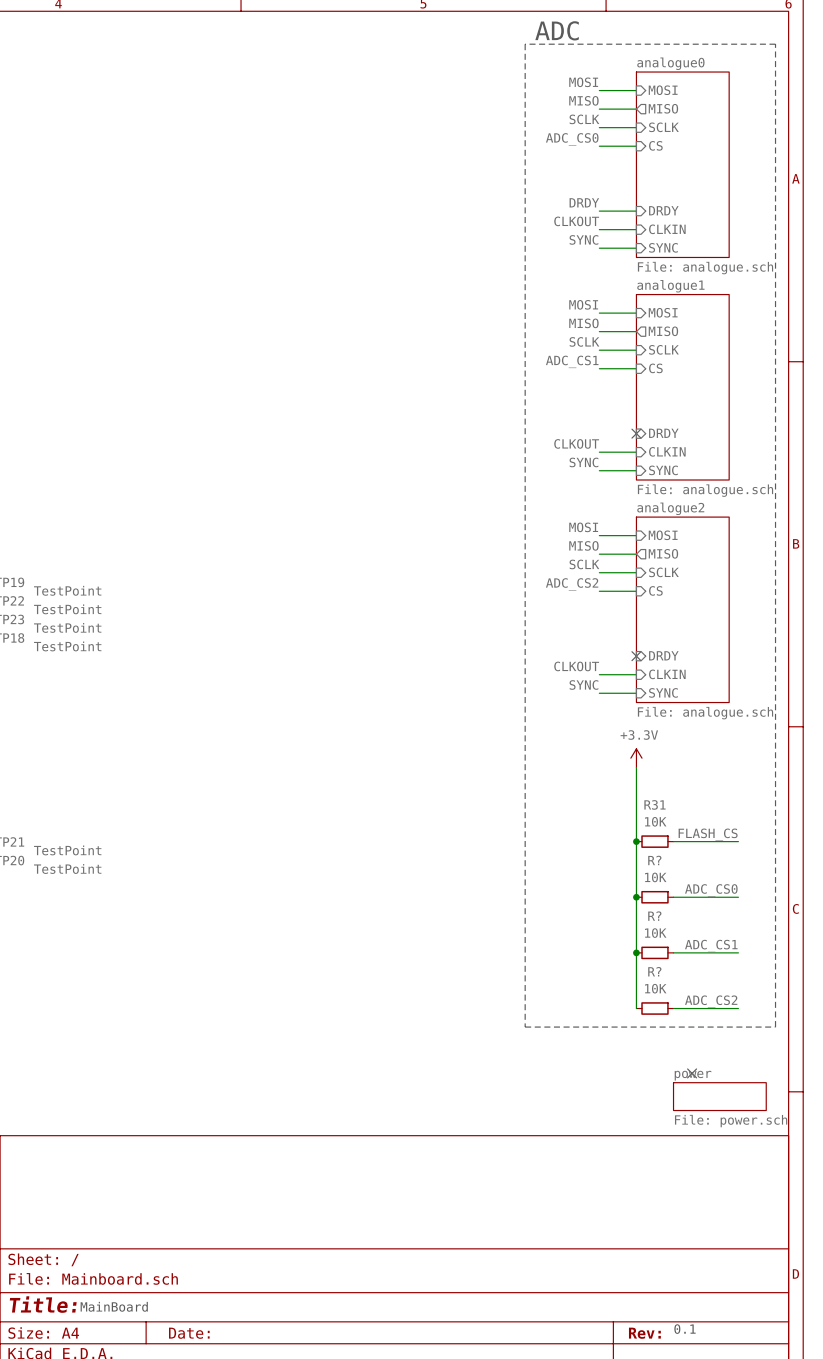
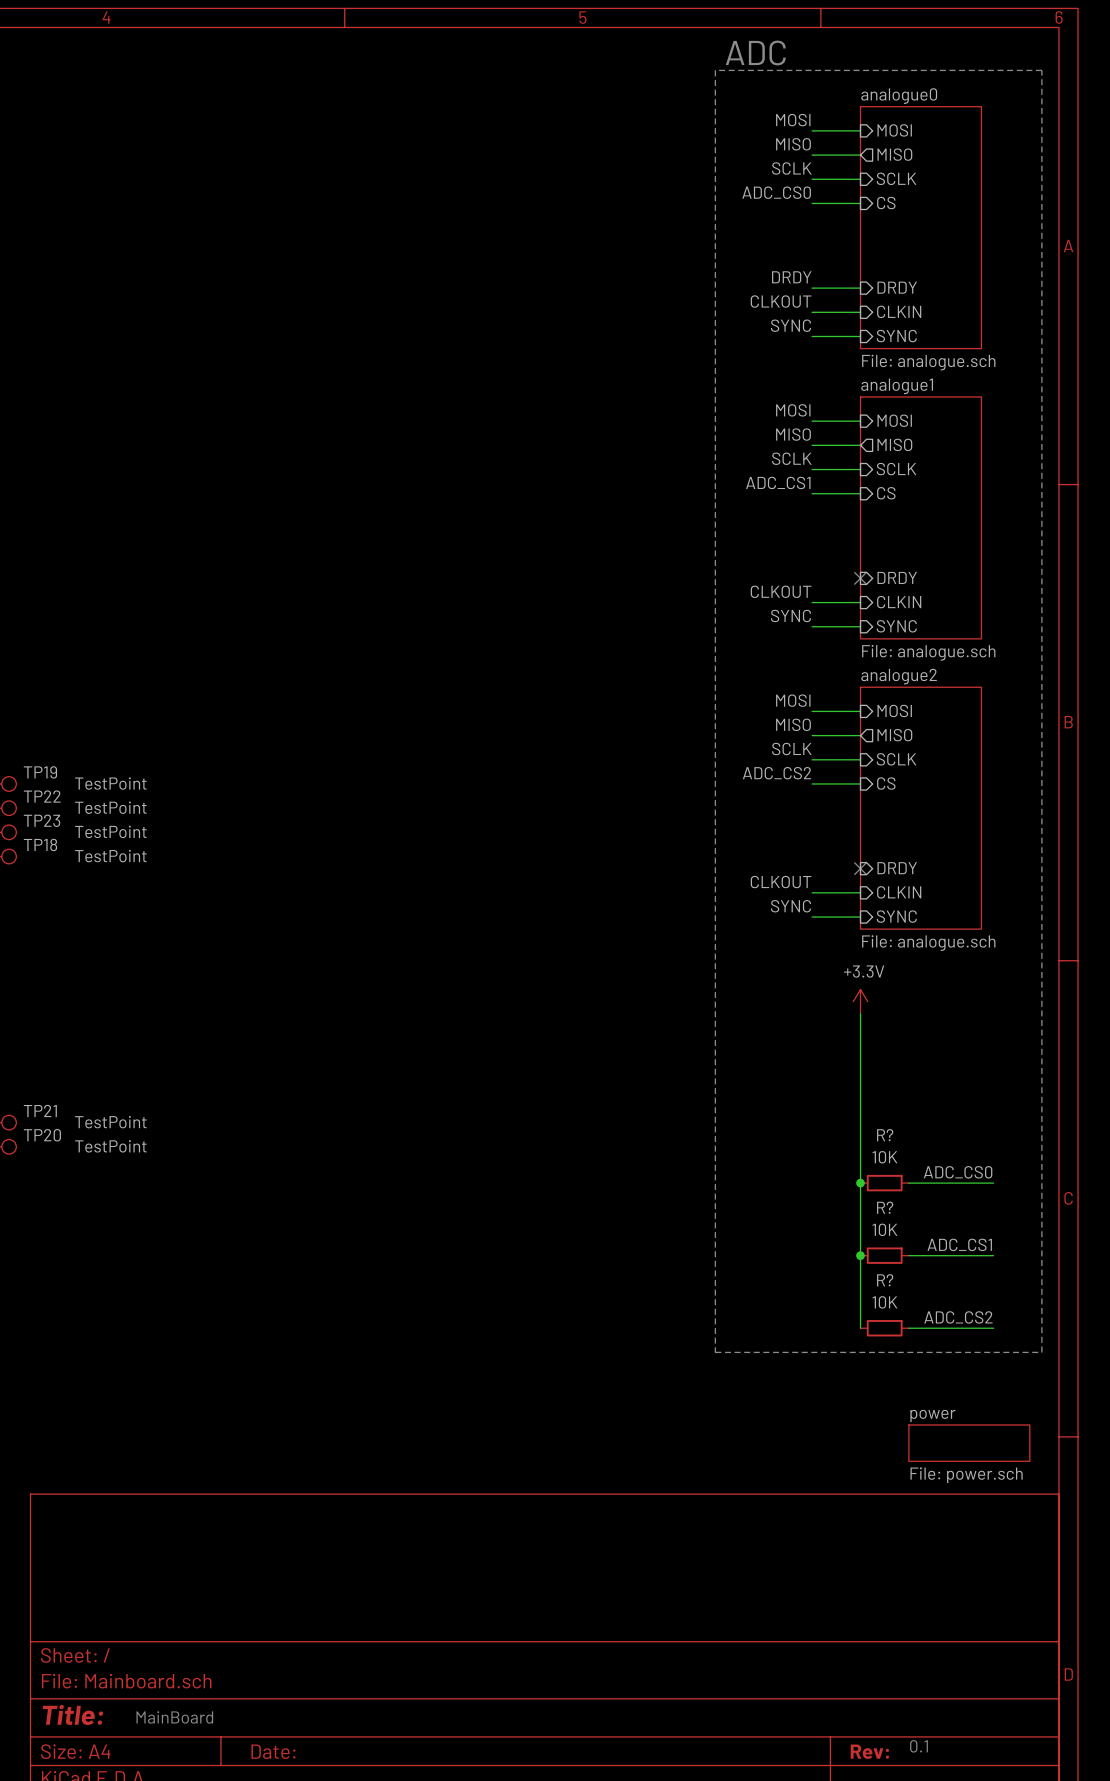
label: FLASH_CS (708, 834) -> none
junction: (636, 841) -> none
R31: 10K (654, 841) -> none
wire: (673, 841) (738, 841) -> none
no-connect mark: (692, 1073) -> none

